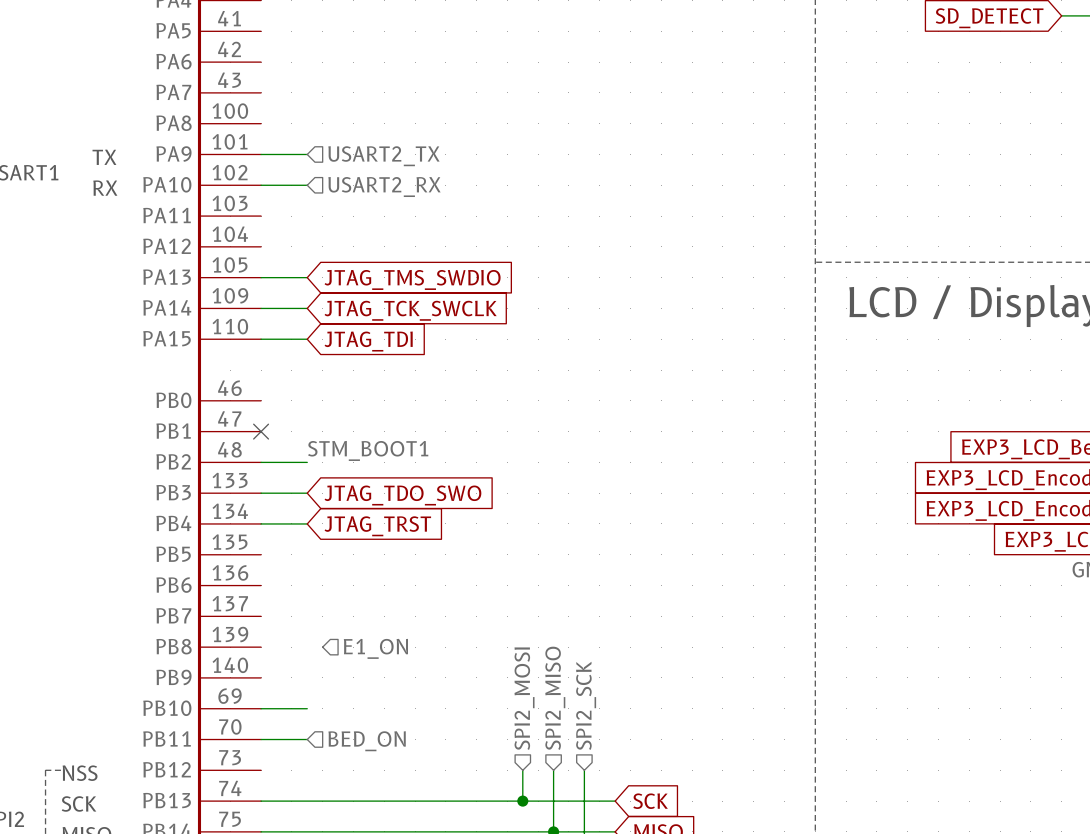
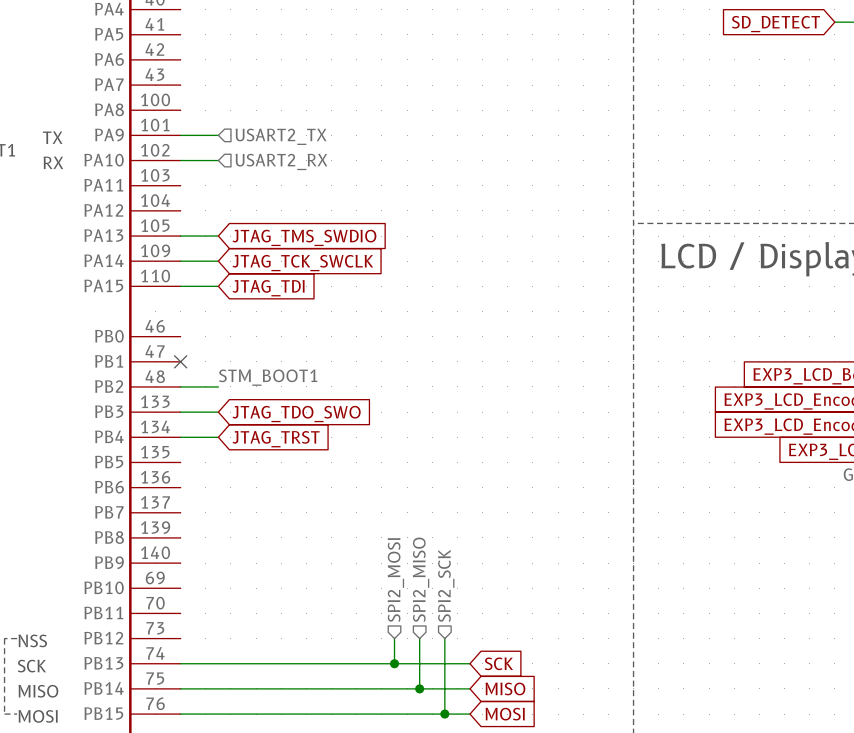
hierarchical label: E1_ON (375, 648) -> none
wire: (261, 708) (307, 708) -> none
wire: (261, 739) (307, 739) -> none
hierarchical label: BED_ON (367, 741) -> none

